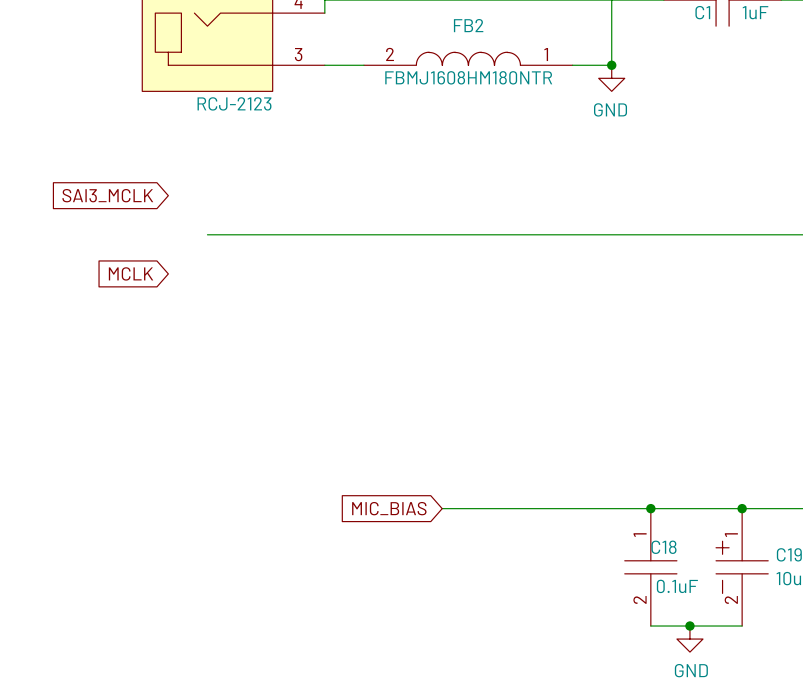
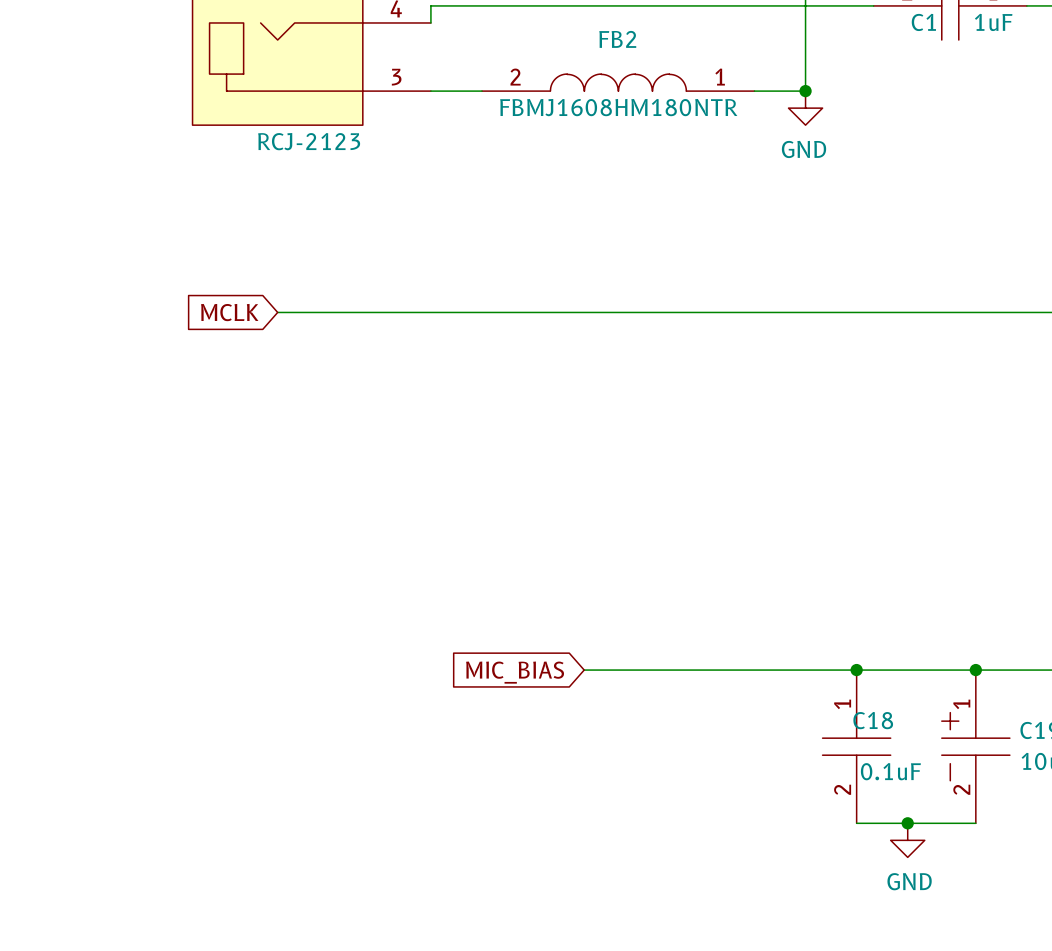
global label: SAI3_MCLK (107, 195) -> none
global label position: MCLK (131, 273) -> MCLK (229, 312)

